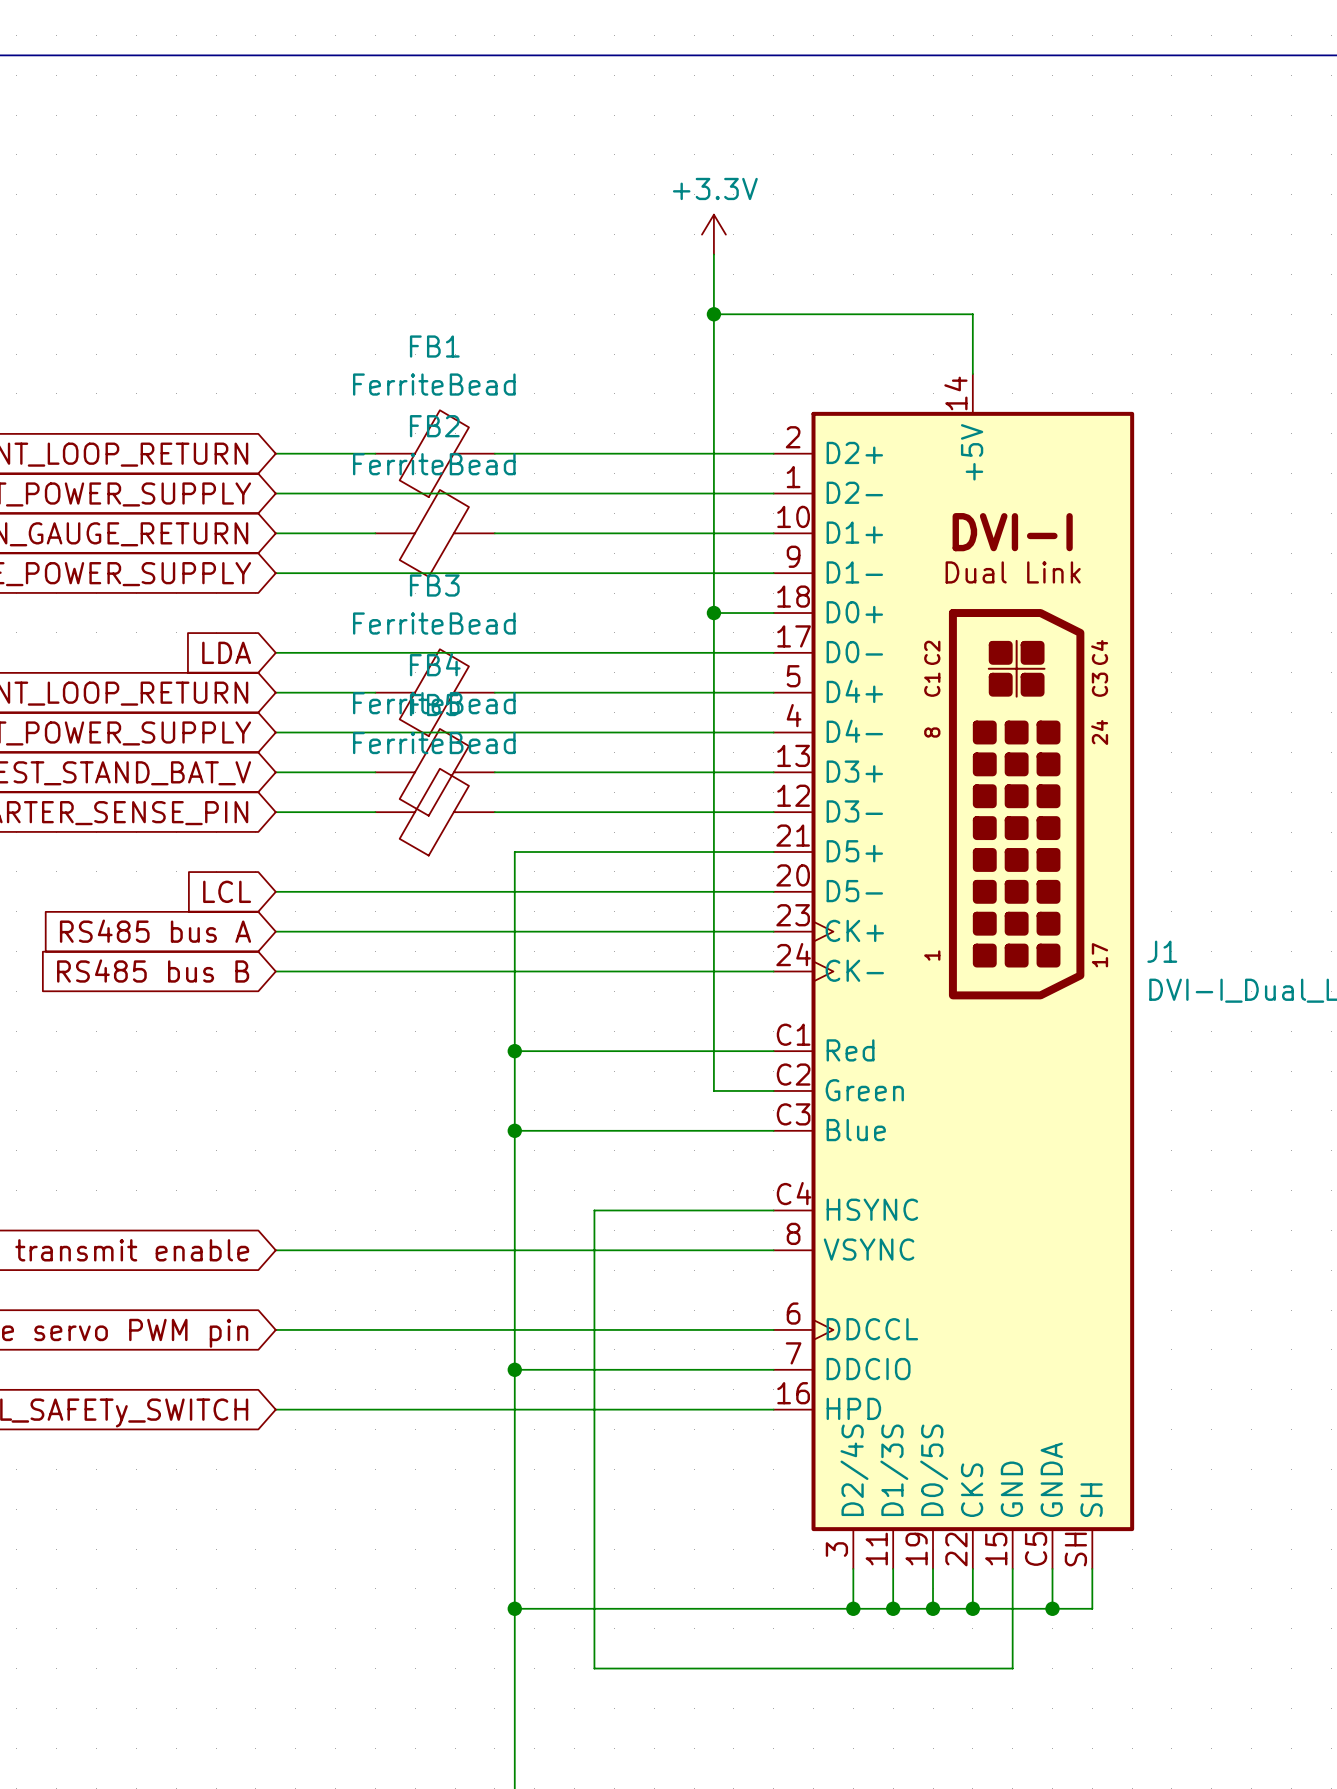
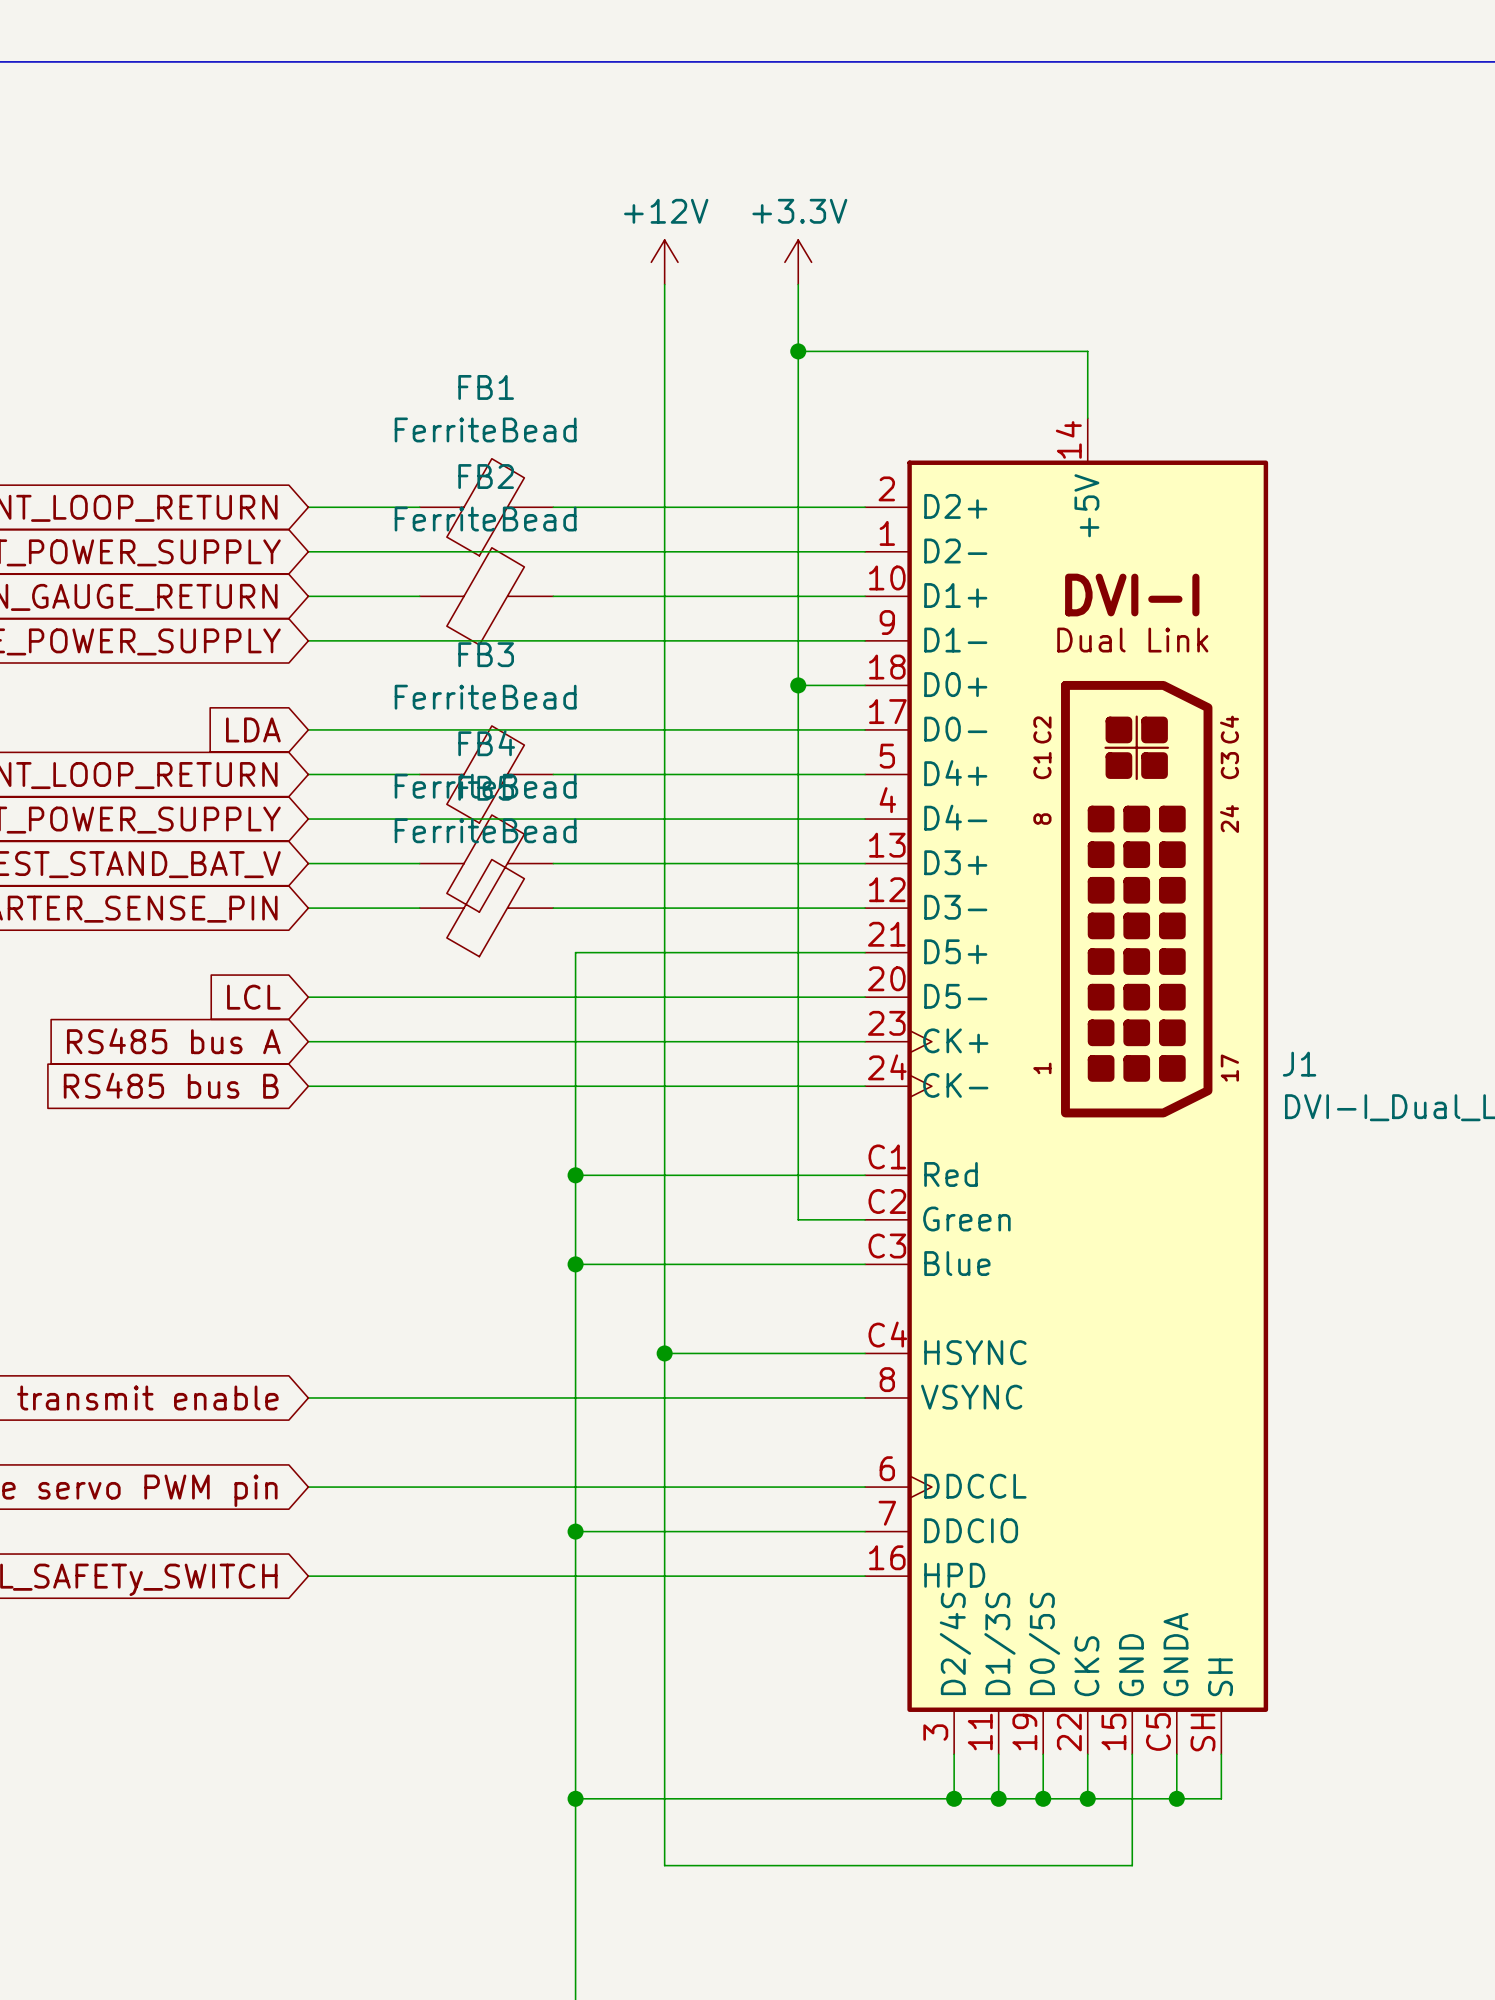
power symbol: none -> +12V (664, 262)
wire: none -> (664, 284) (664, 1353)
junction: none -> (664, 1353)

